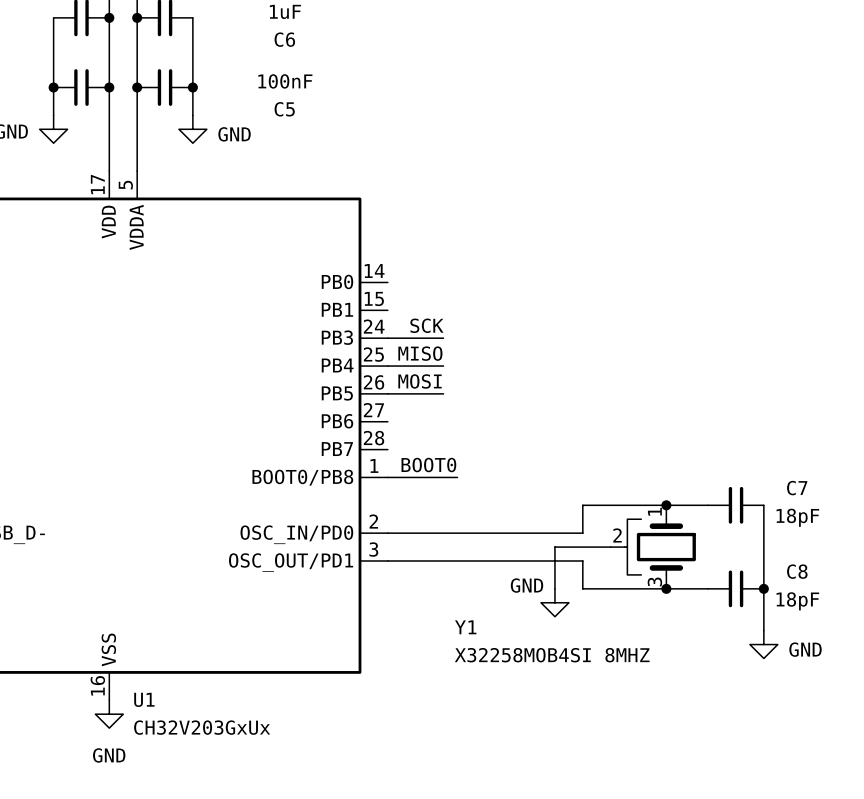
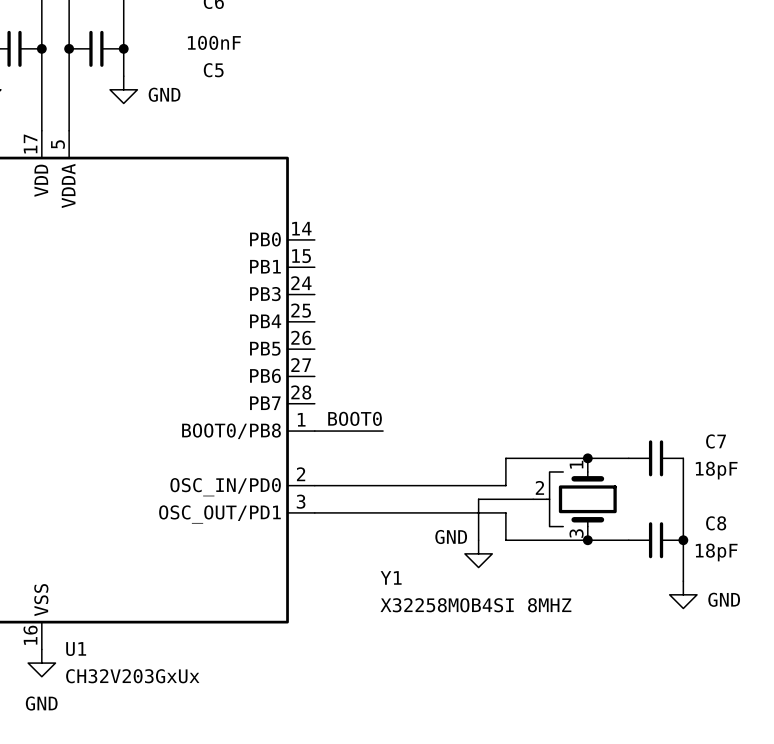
label: SCK (426, 325) -> none
wire: (387, 338) (443, 338) -> none
label: MISO (420, 353) -> none
wire: (387, 366) (443, 366) -> none
label: MOSI (420, 381) -> none
wire: (387, 393) (443, 393) -> none

